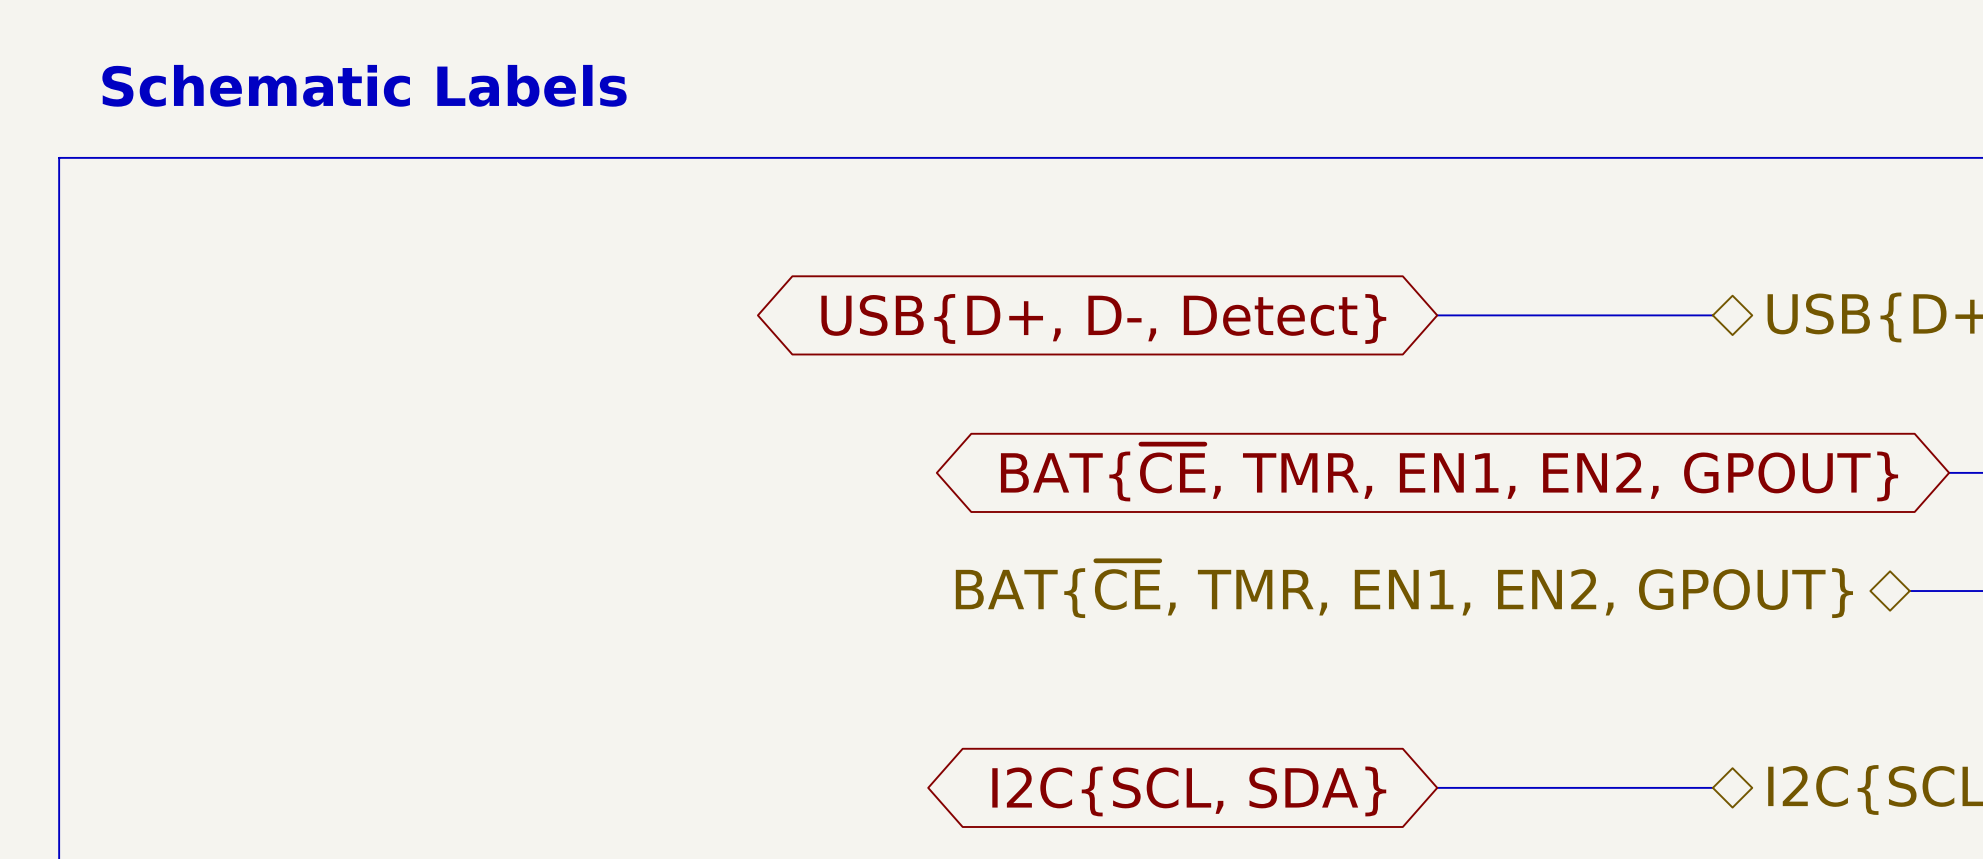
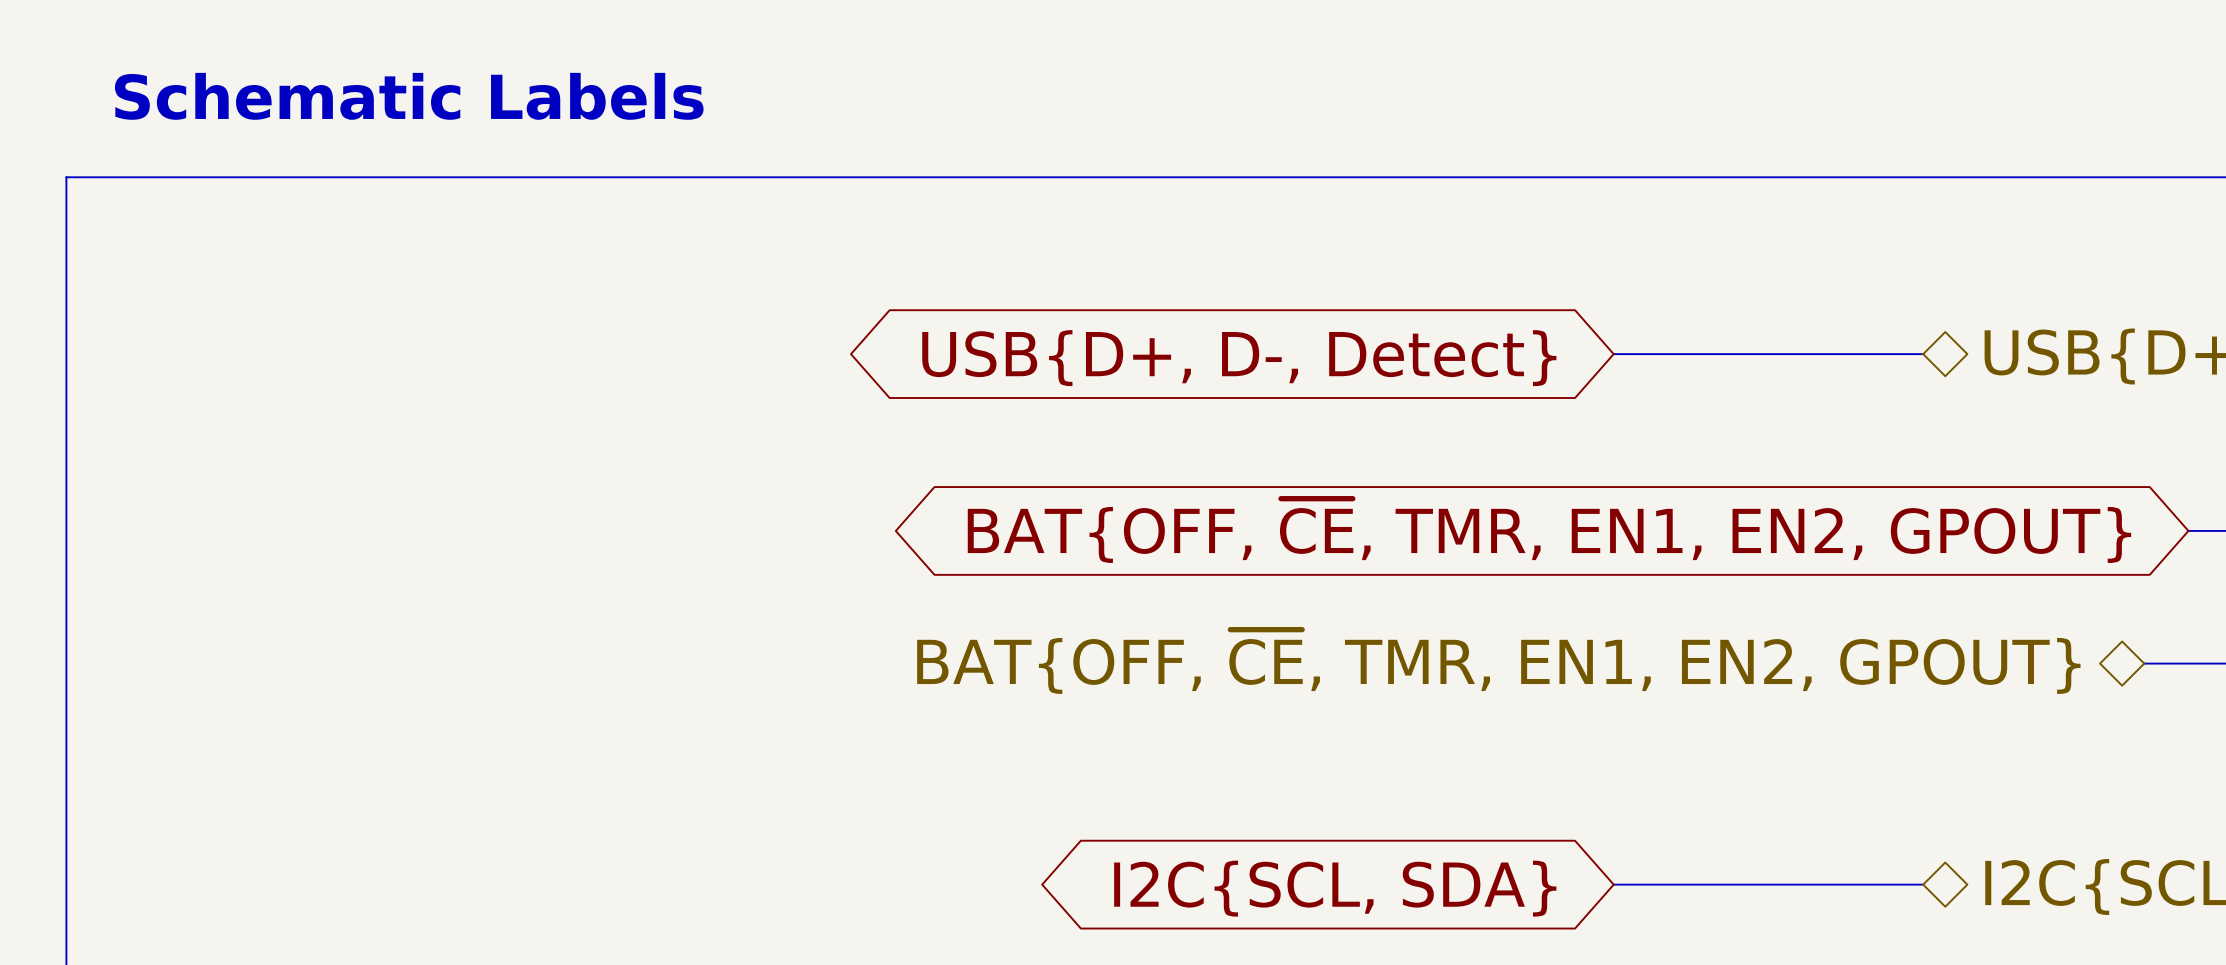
global label: BAT{~{CE}, TMR, EN1, EN2, GPOUT} (1449, 472) -> BAT{OFF, ~{CE}, TMR, EN1, EN2, GPOUT} (1549, 530)
hierarchical label: BAT{~{CE}, TMR, EN1, EN2, GPOUT} (1404, 589) -> BAT{OFF, ~{CE}, TMR, EN1, EN2, GPOUT} (1498, 661)

